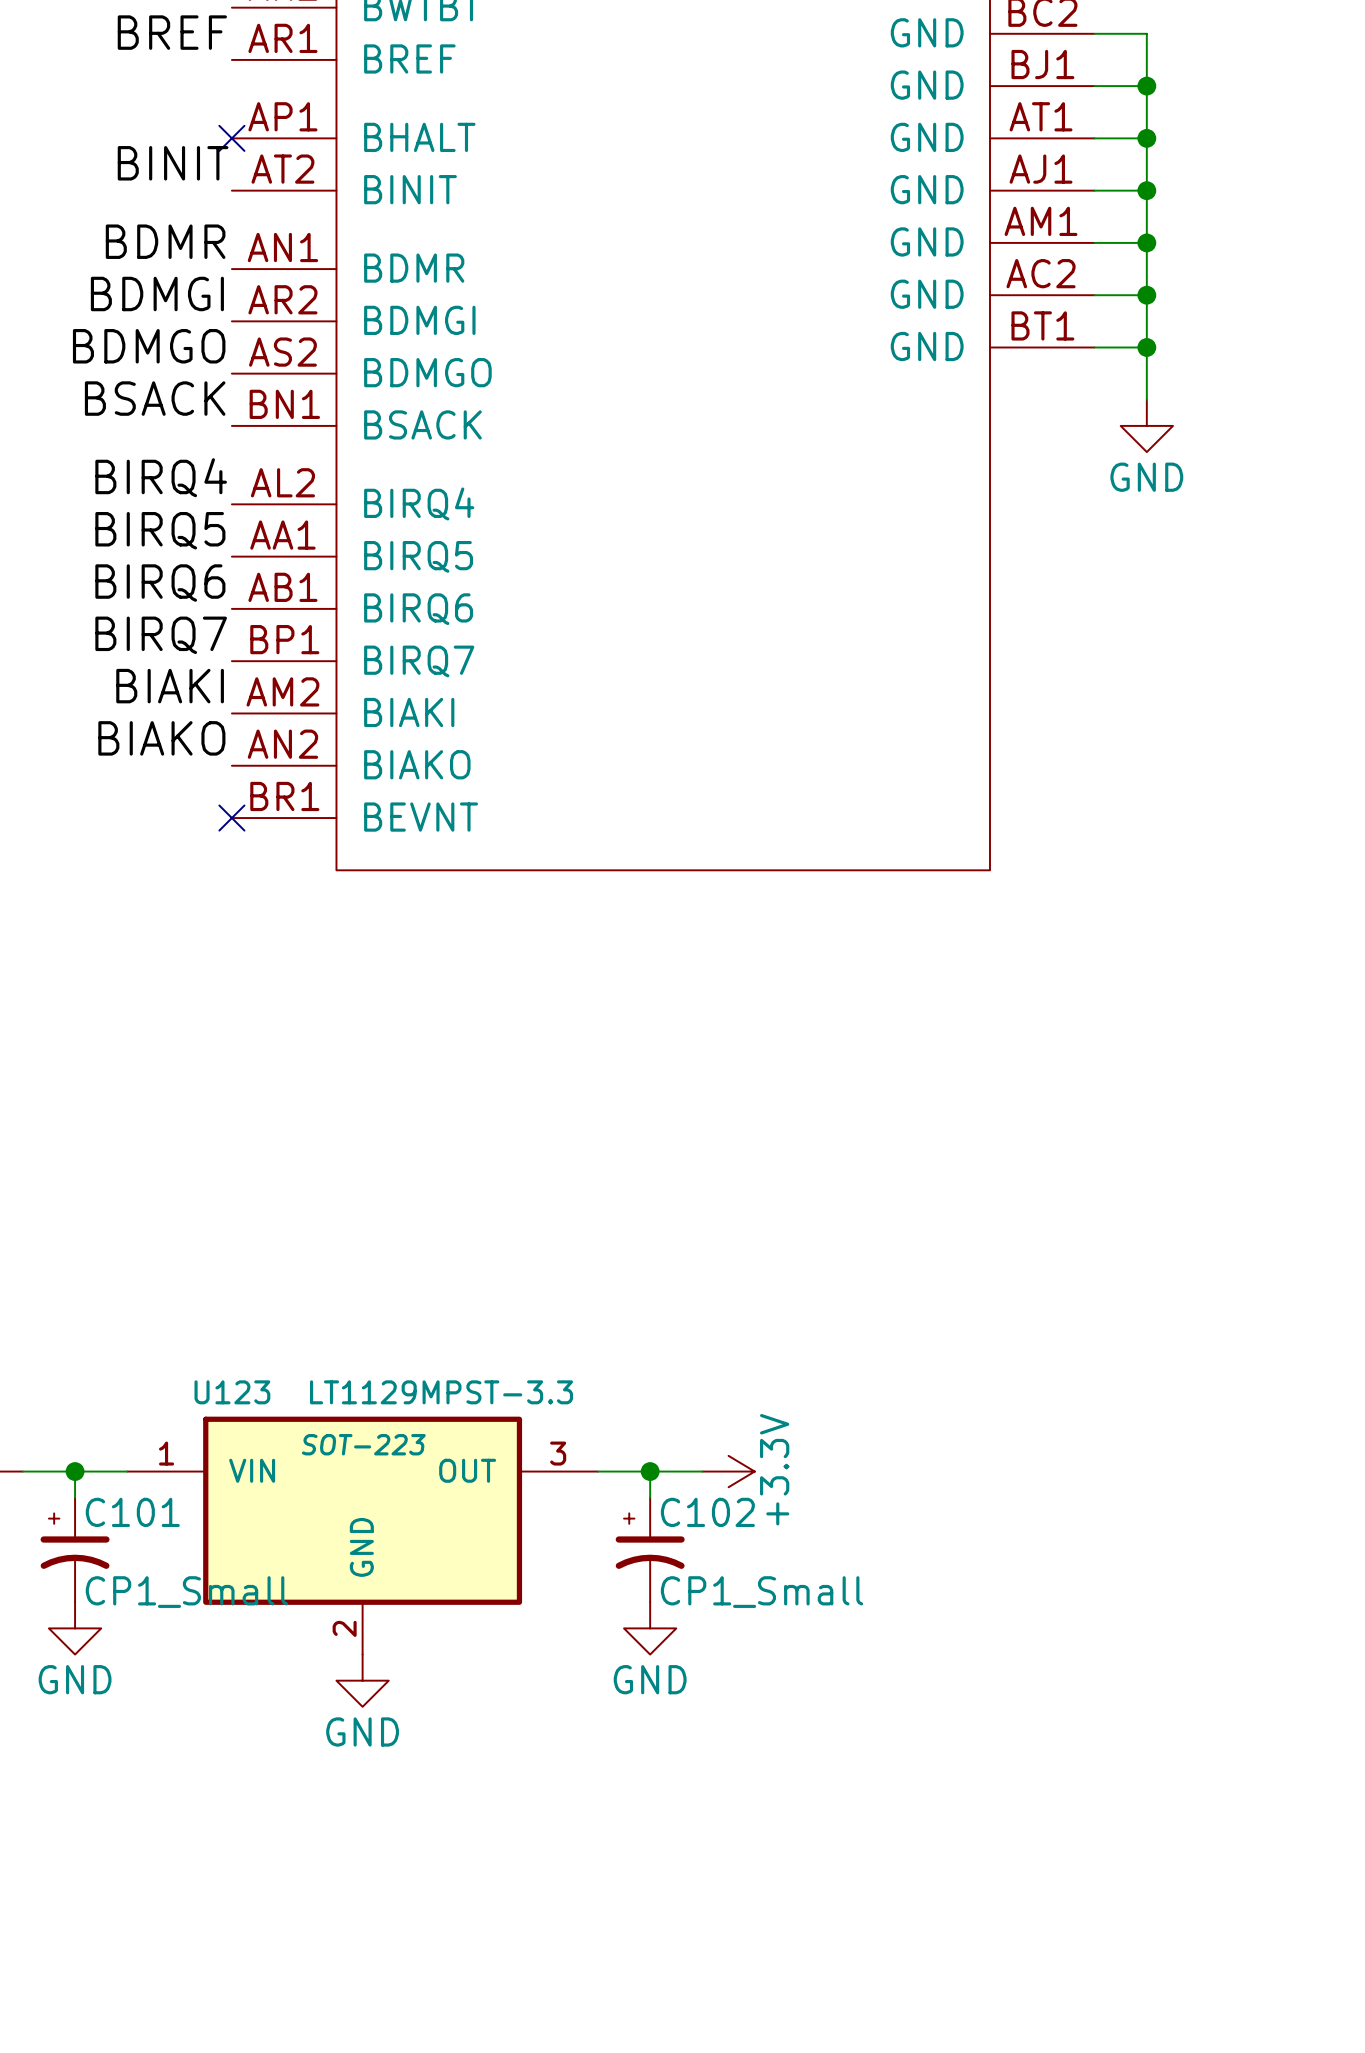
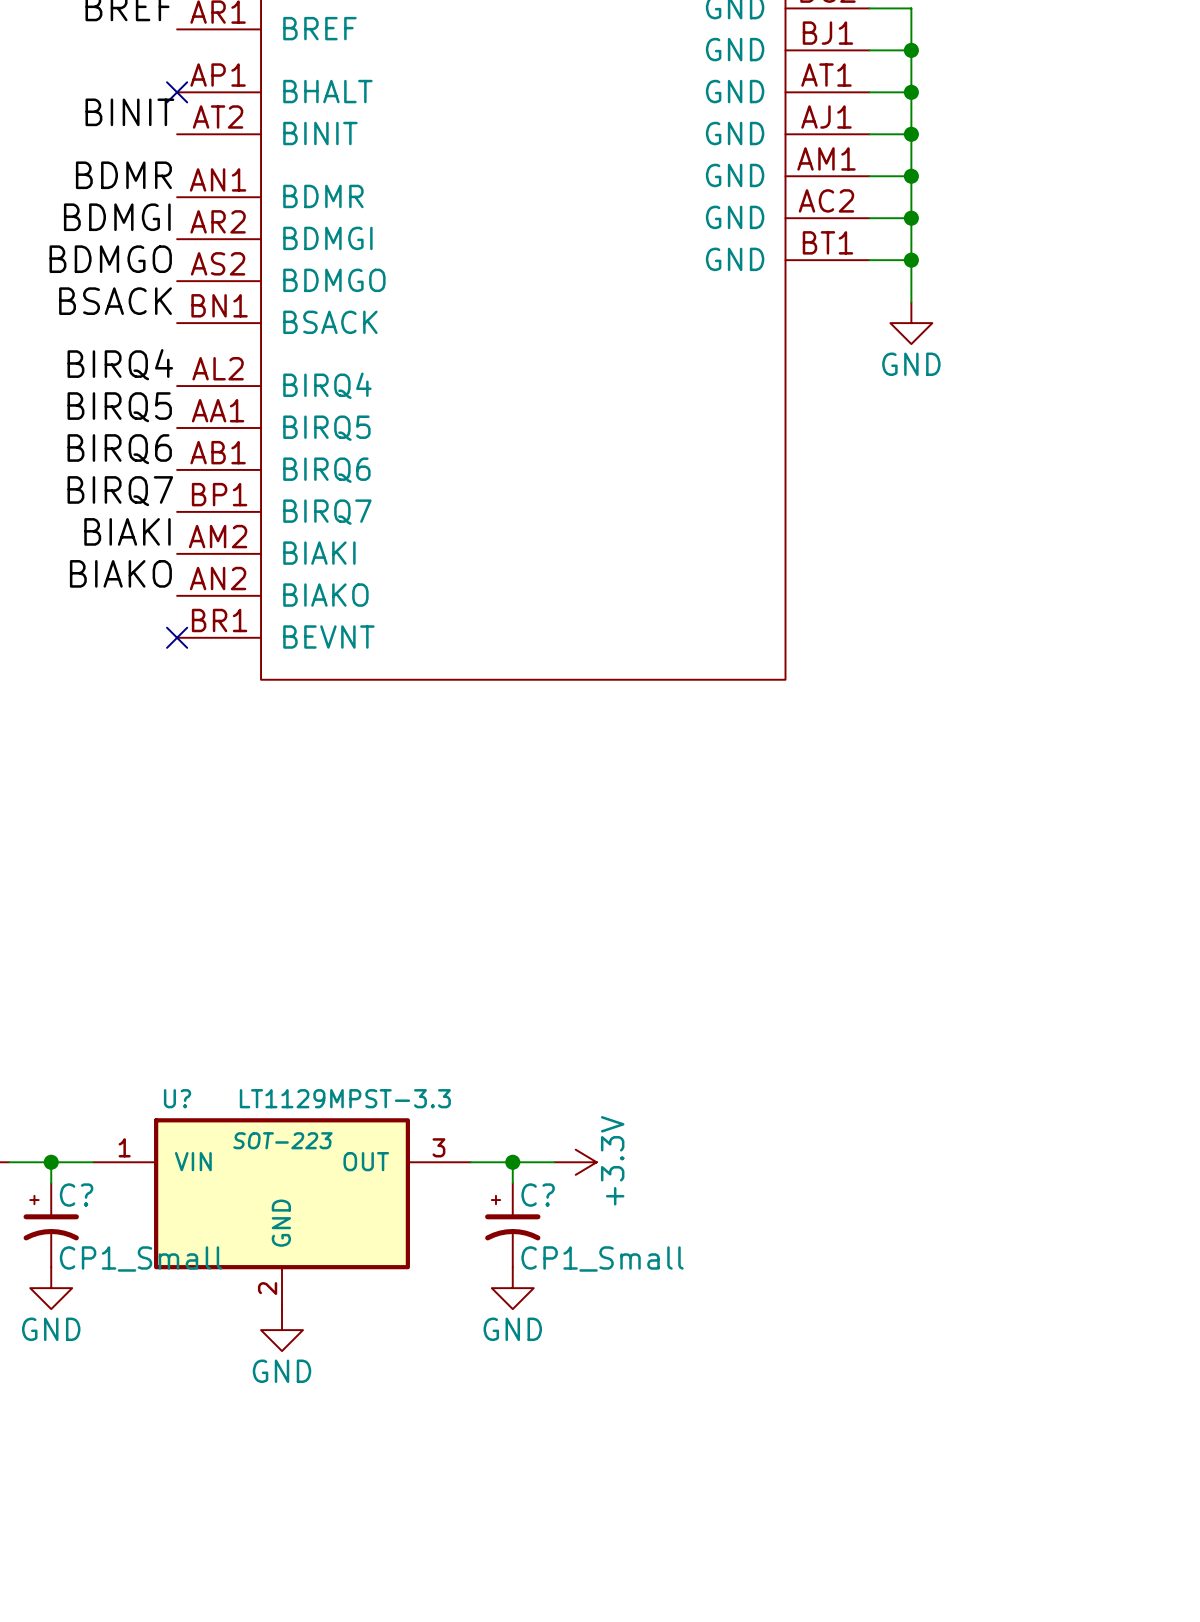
U123 name: U123 (232, 1392) -> U? (177, 1098)
C101 name: C101 (132, 1512) -> C? (76, 1195)
C102 name: C102 (707, 1512) -> C? (538, 1195)

